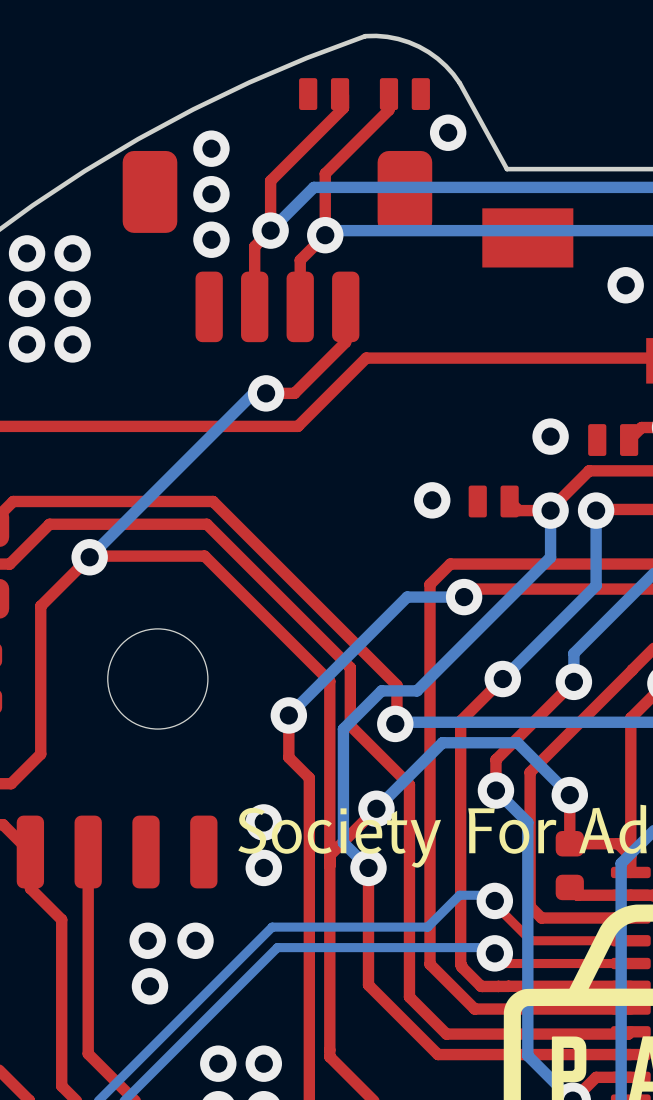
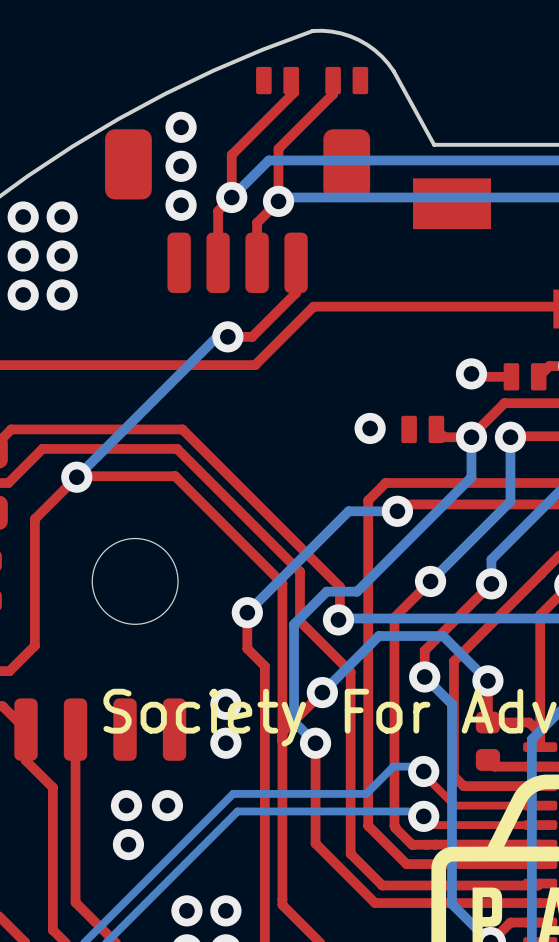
via: (448, 132) -> none
via: (625, 285) -> none
top track: none -> (511, 376) (480, 376)

